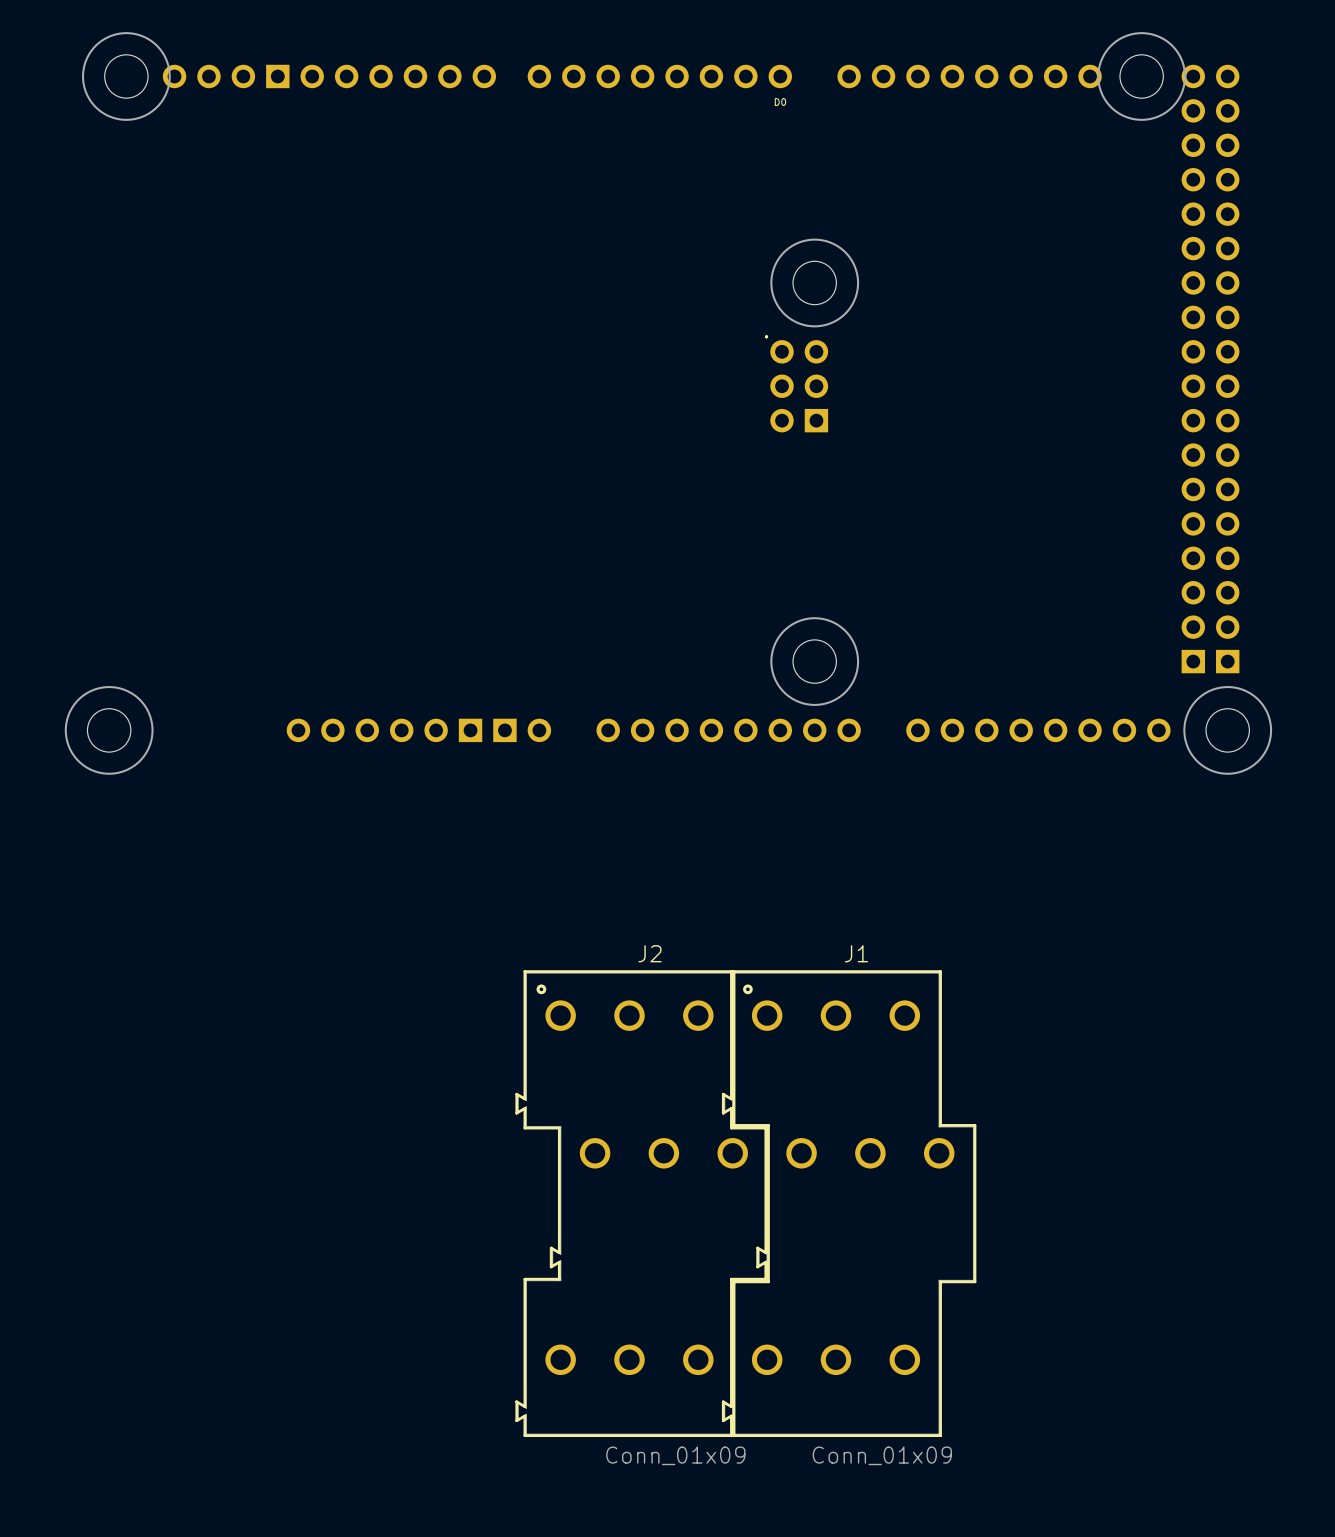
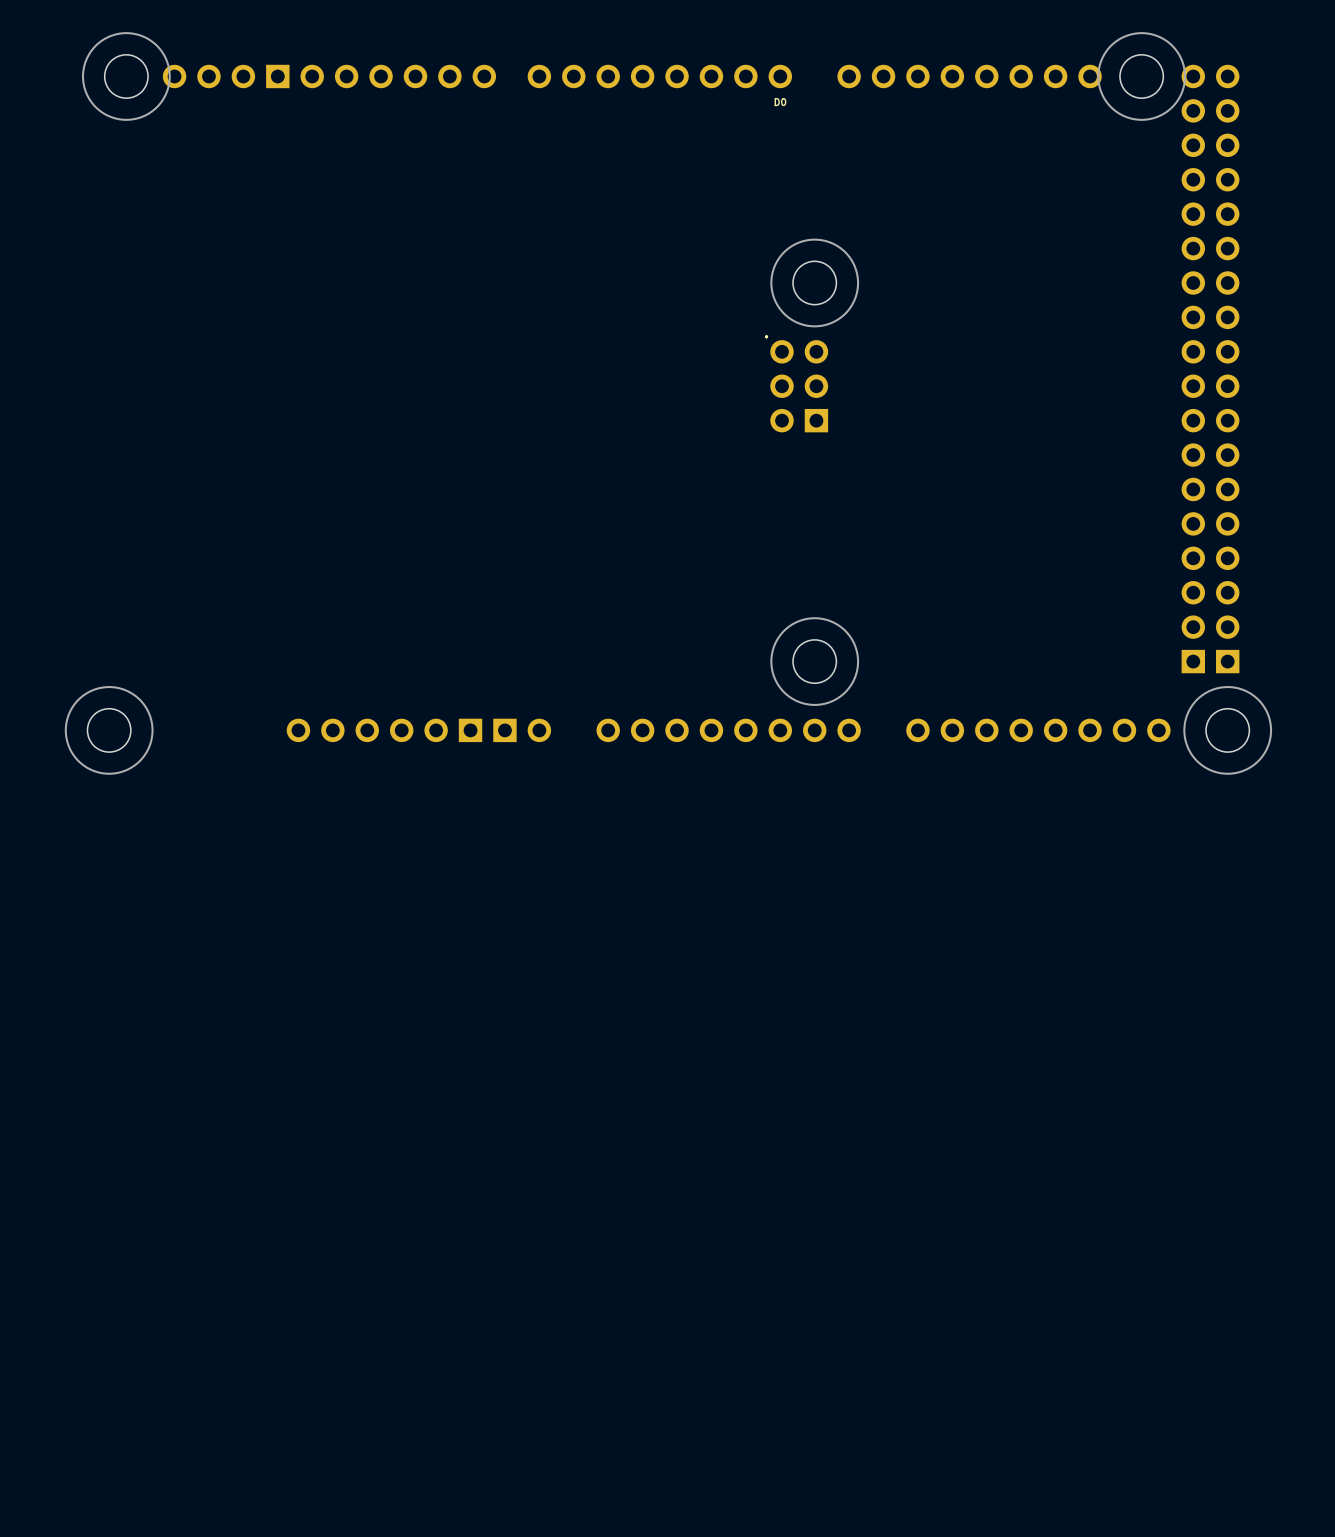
J2: Conn_01x09 (642, 1203) -> none
J1: Conn_01x09 (849, 1203) -> none

